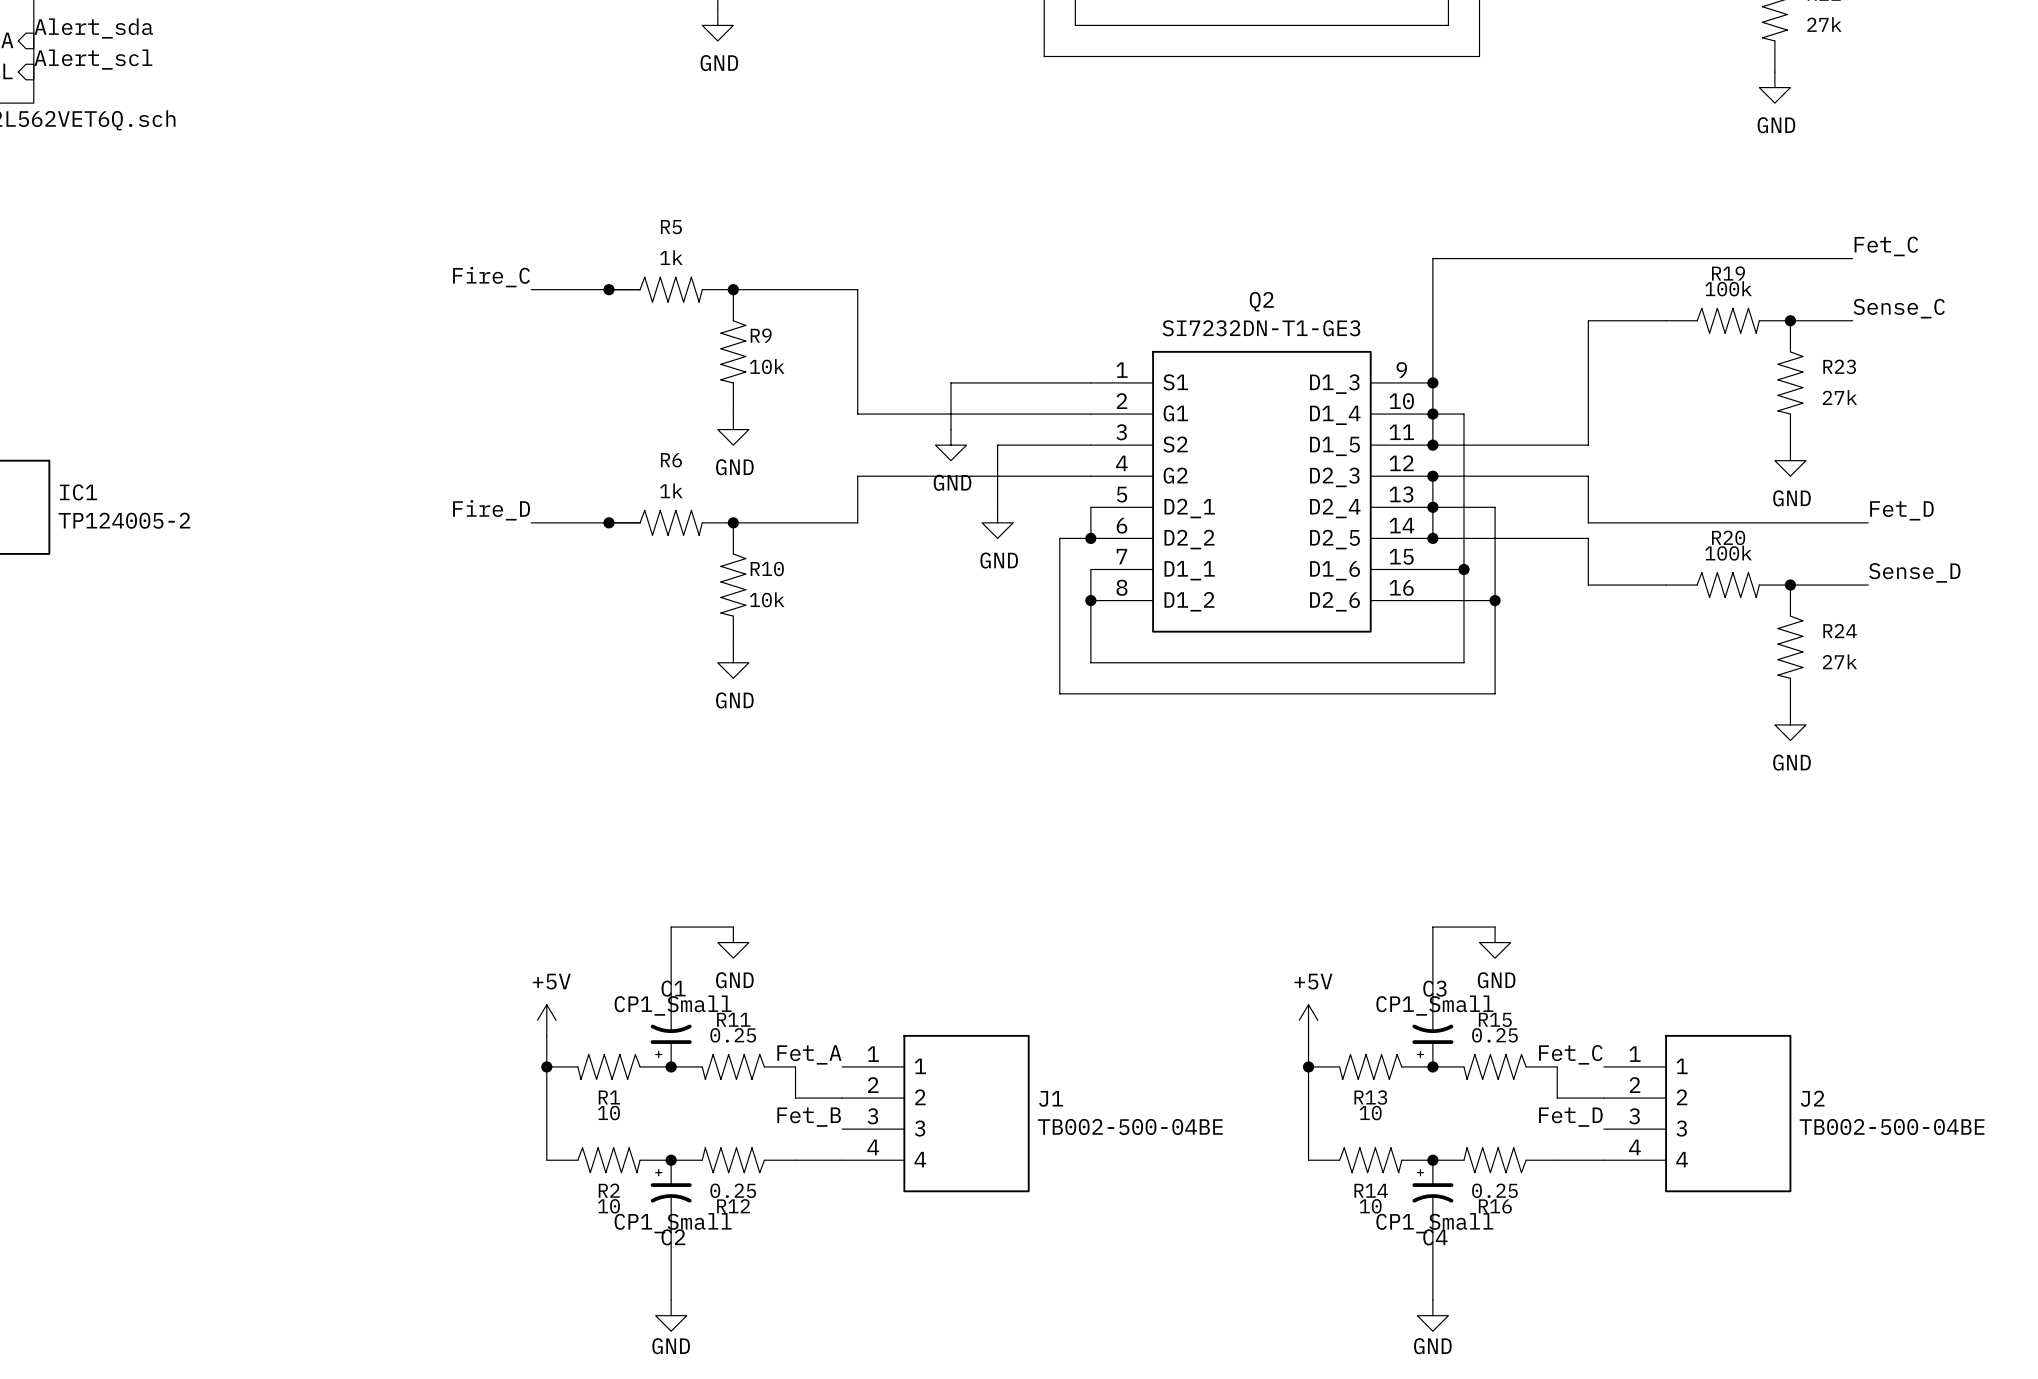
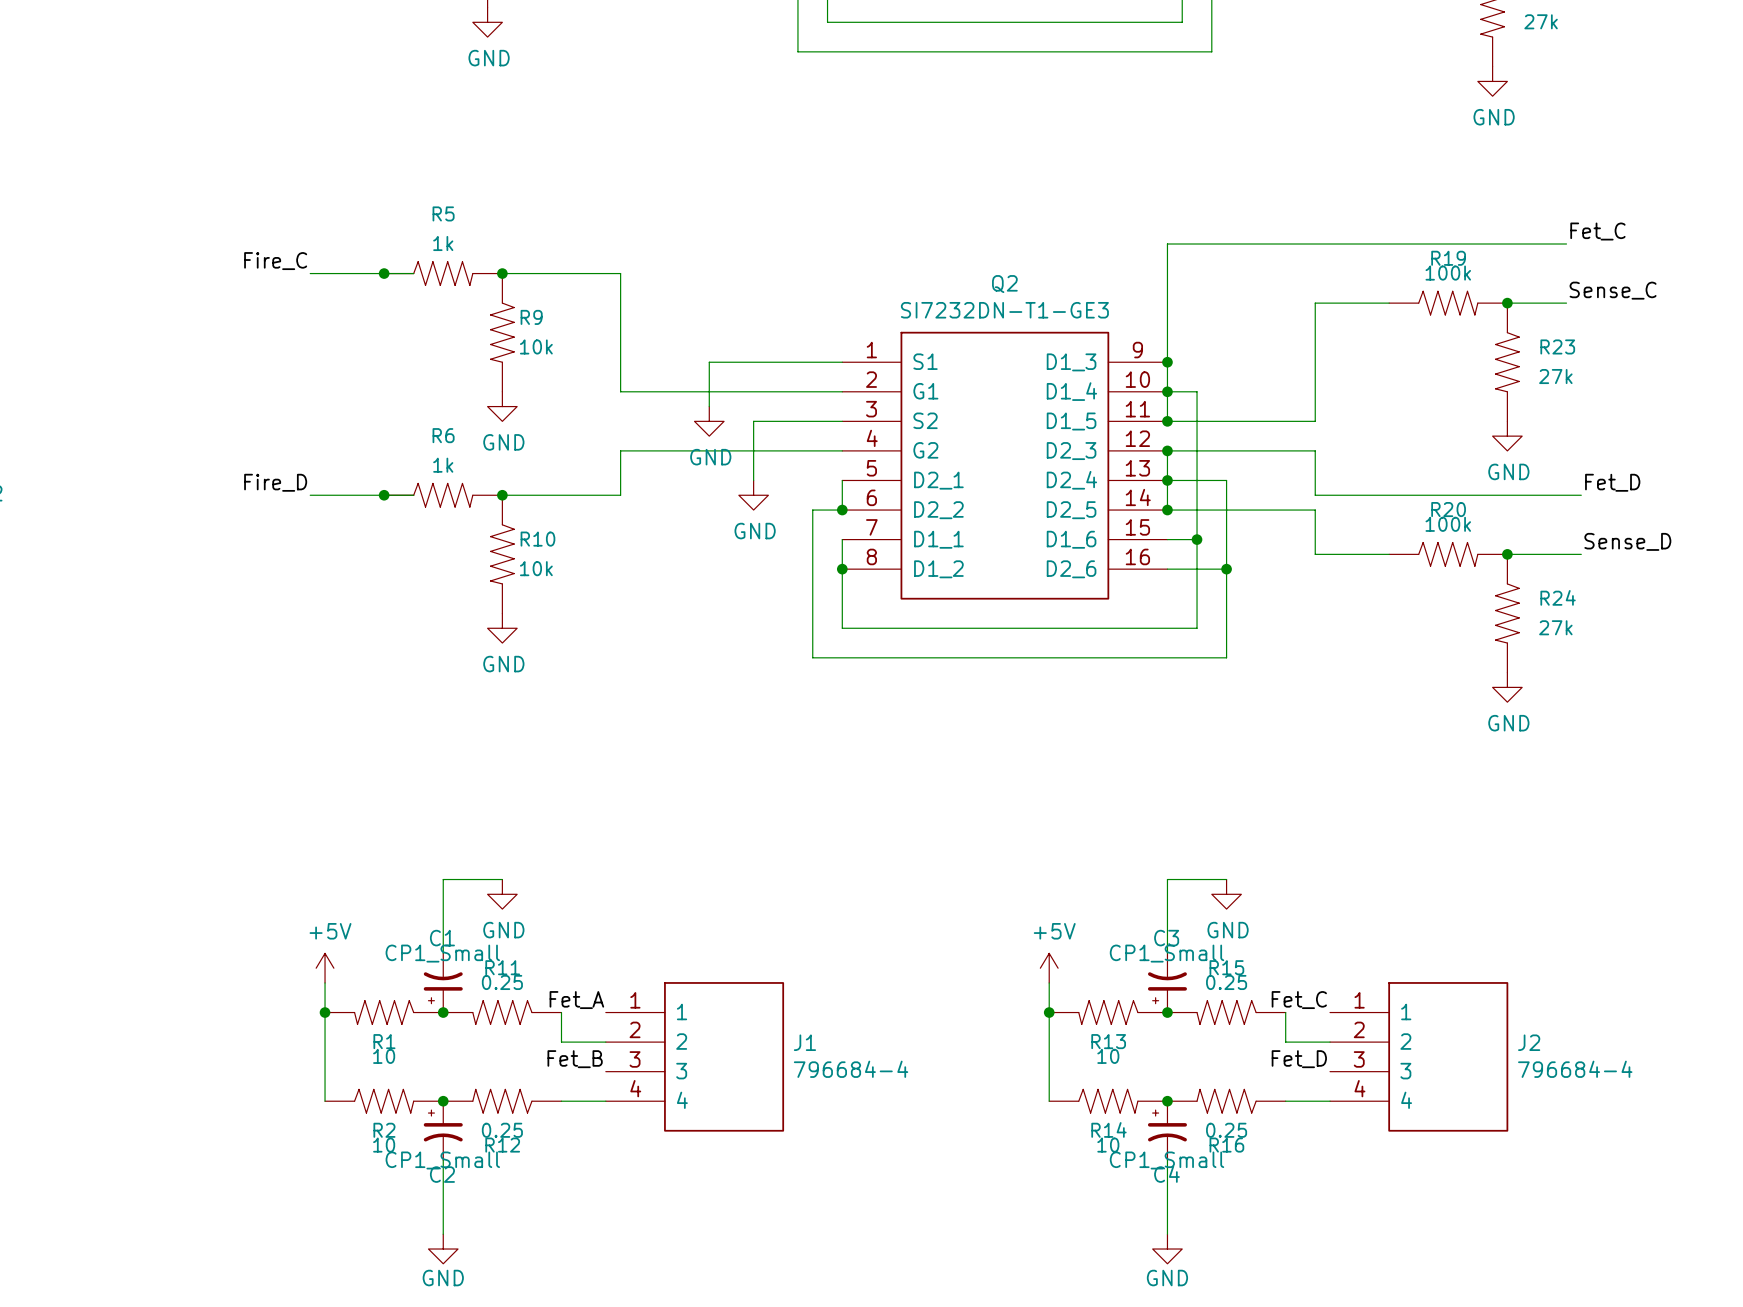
J1 value: TB002-500-04BE (1130, 1126) -> 796684-4 (851, 1069)
J2 value: TB002-500-04BE (1892, 1126) -> 796684-4 (1575, 1069)

